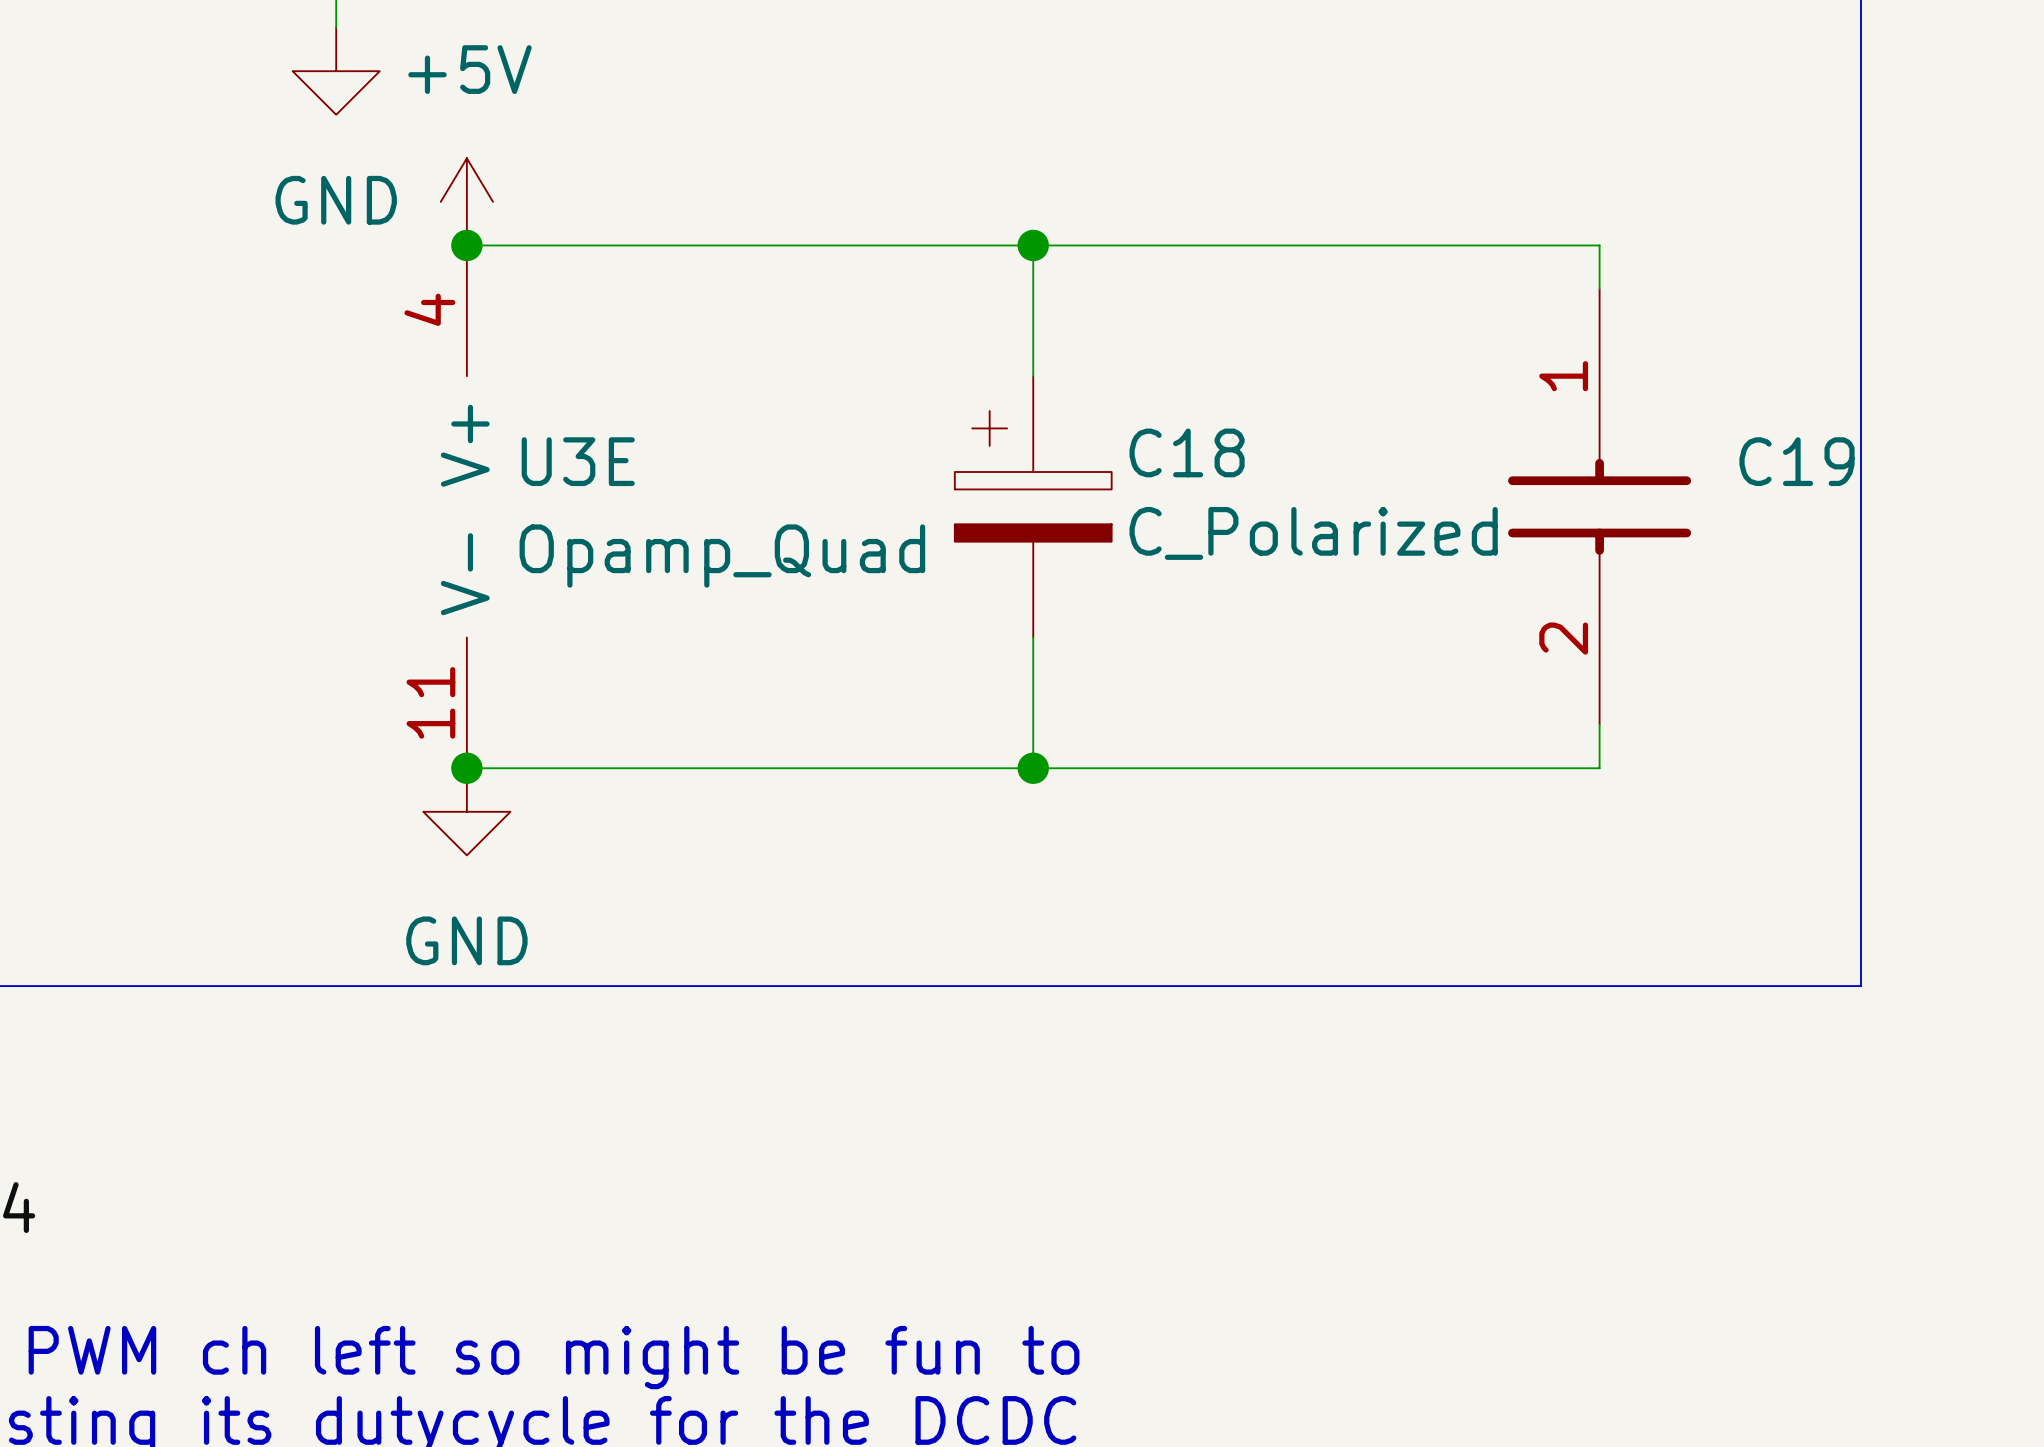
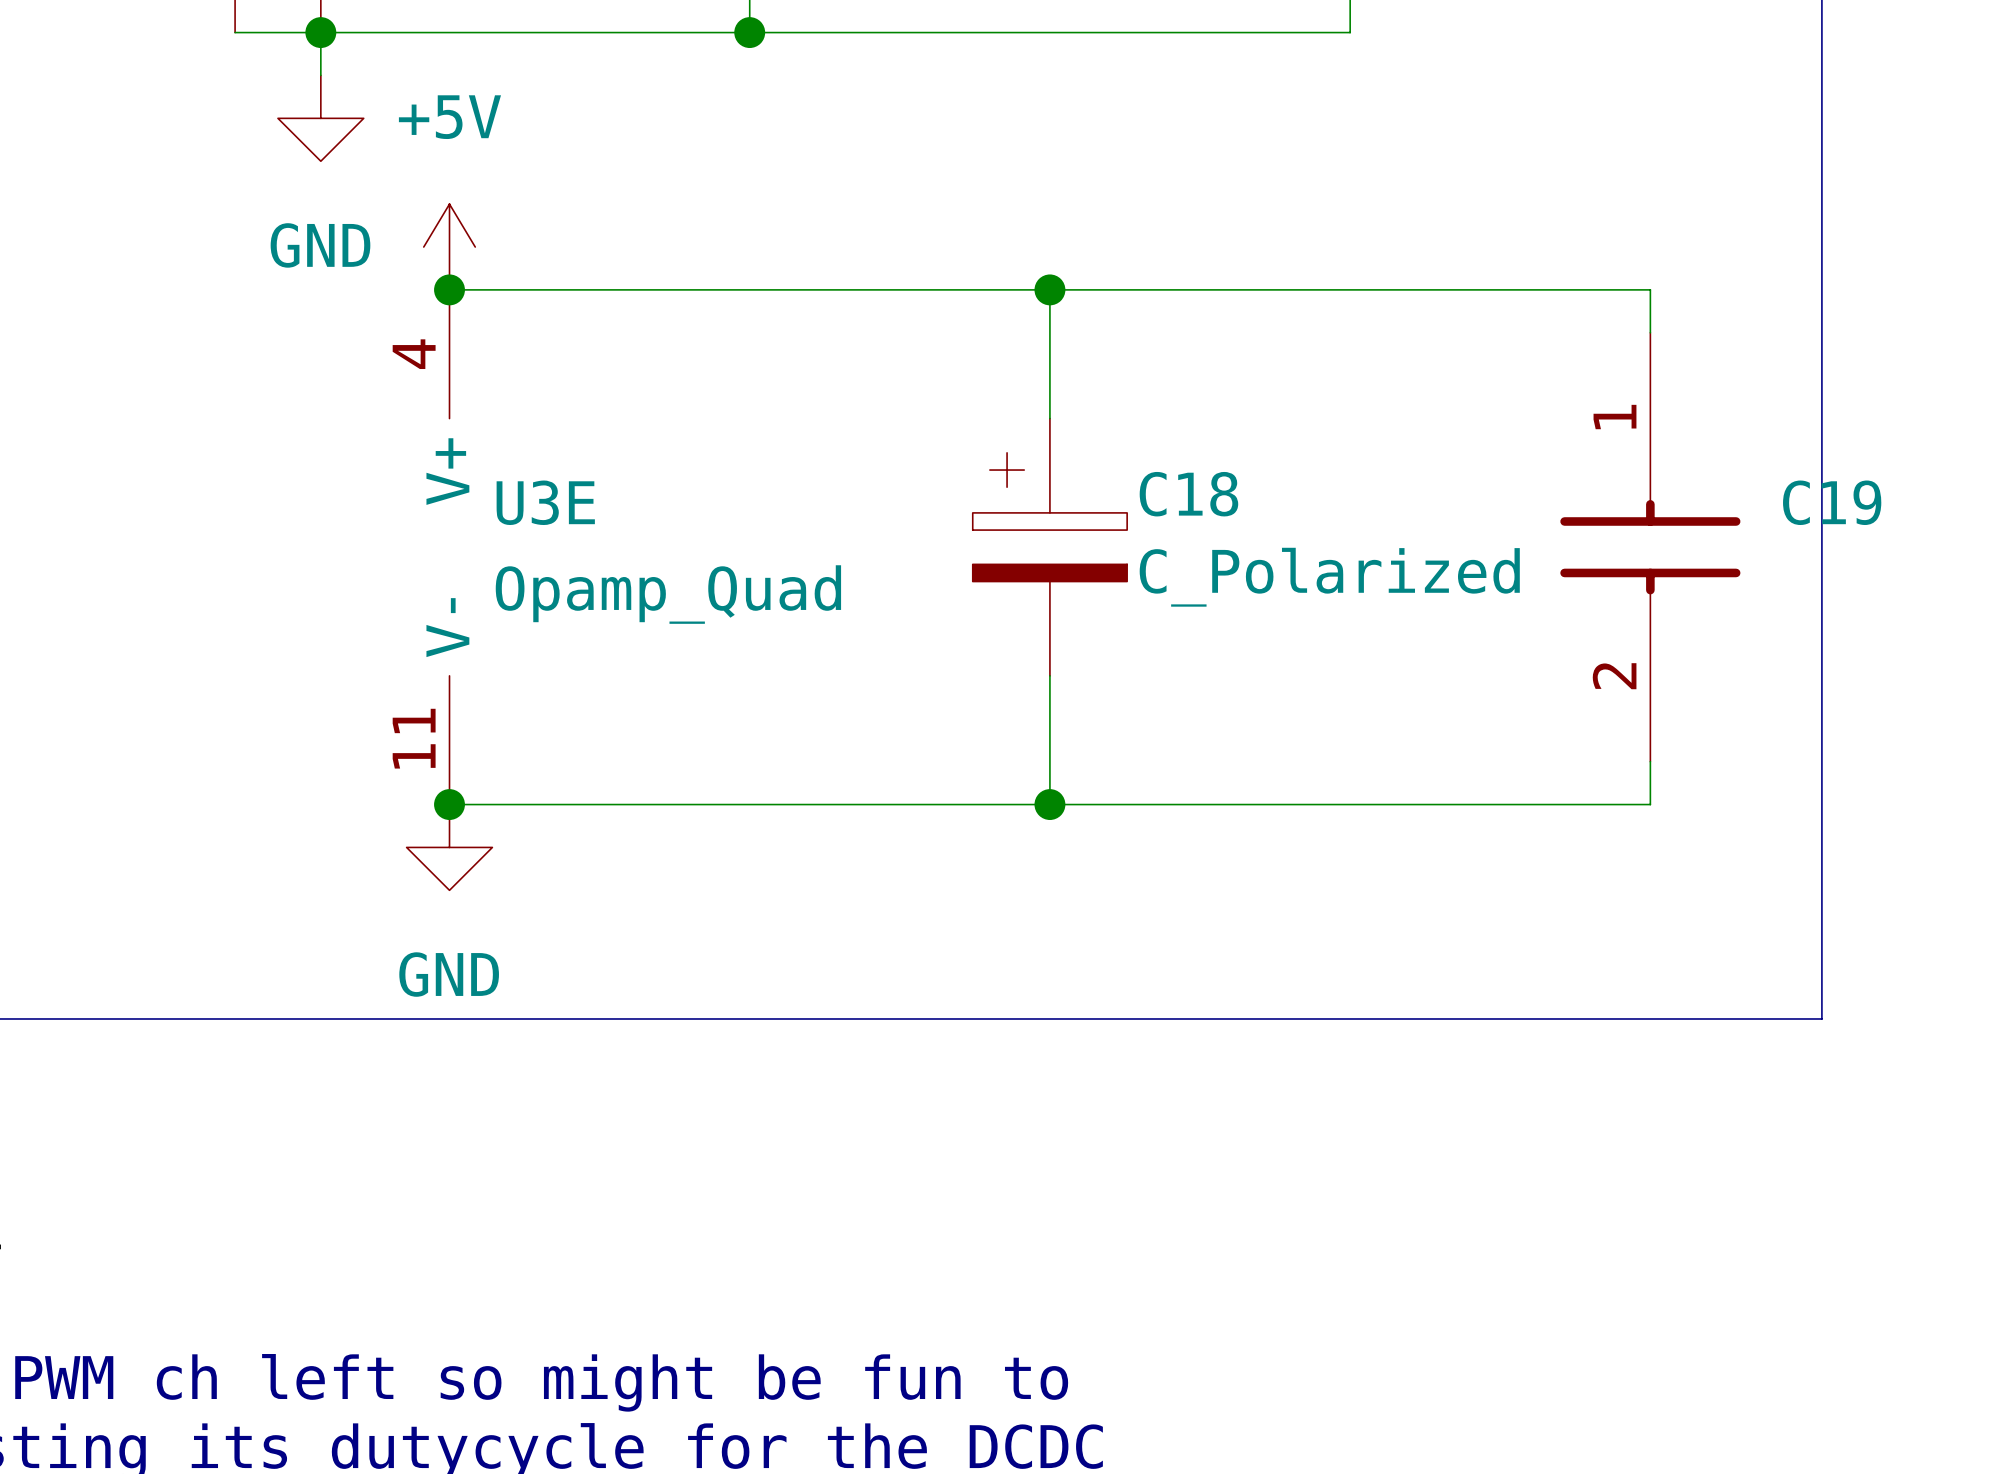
wire: (1033, 245) (1033, 376) -> (1049, 289) (1049, 418)
junction position: (1033, 245) -> (1049, 289)
wire: (1599, 245) (1599, 289) -> (1564, 289) (1650, 289) (1650, 332)
C18 position: (1033, 506) -> (1049, 547)
C19 position: (1599, 506) -> (1650, 547)
wire: (1033, 637) (1033, 768) -> (1049, 675) (1049, 804)
wire: (1599, 724) (1599, 768) -> (1650, 761) (1650, 804) (1564, 804)
junction position: (1033, 768) -> (1049, 804)

